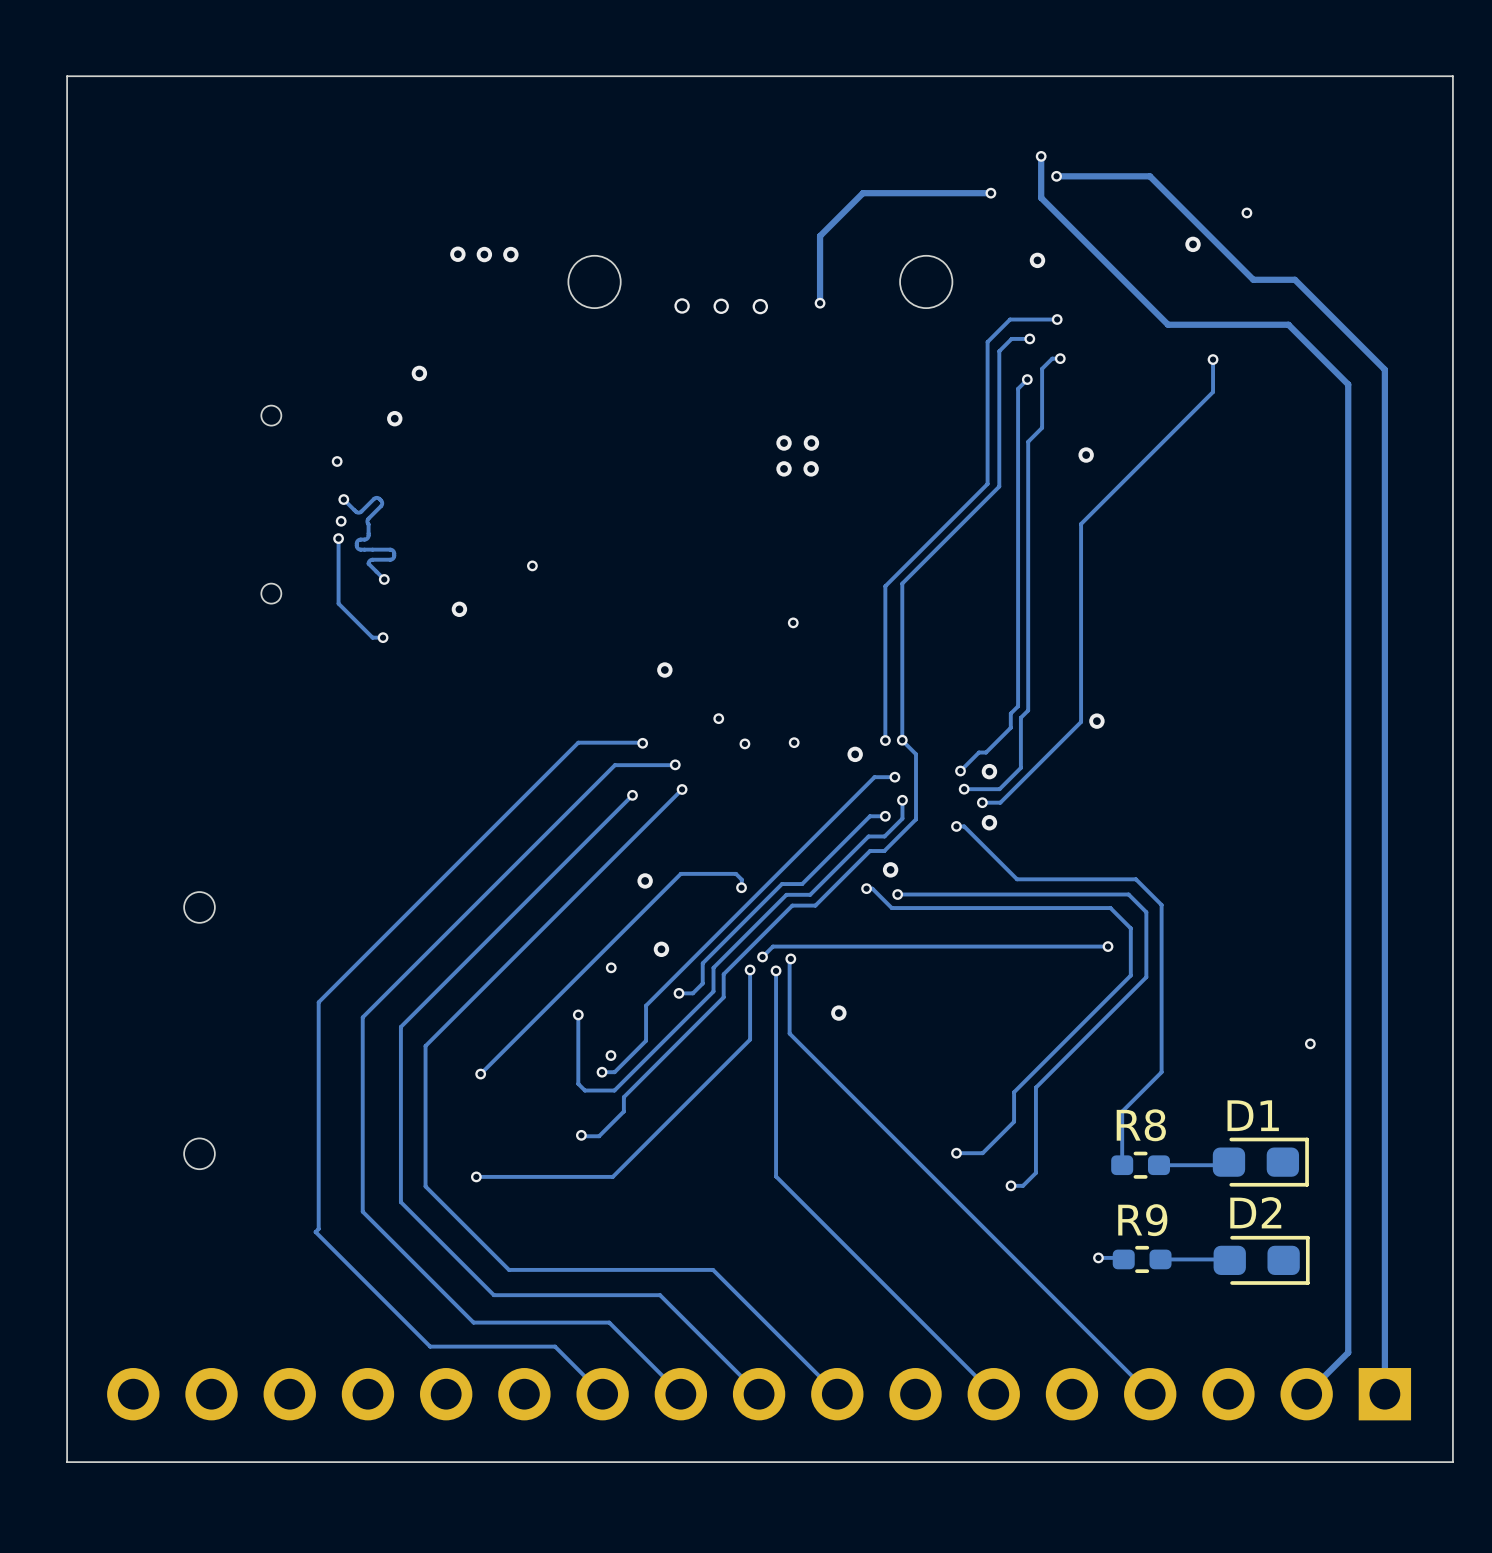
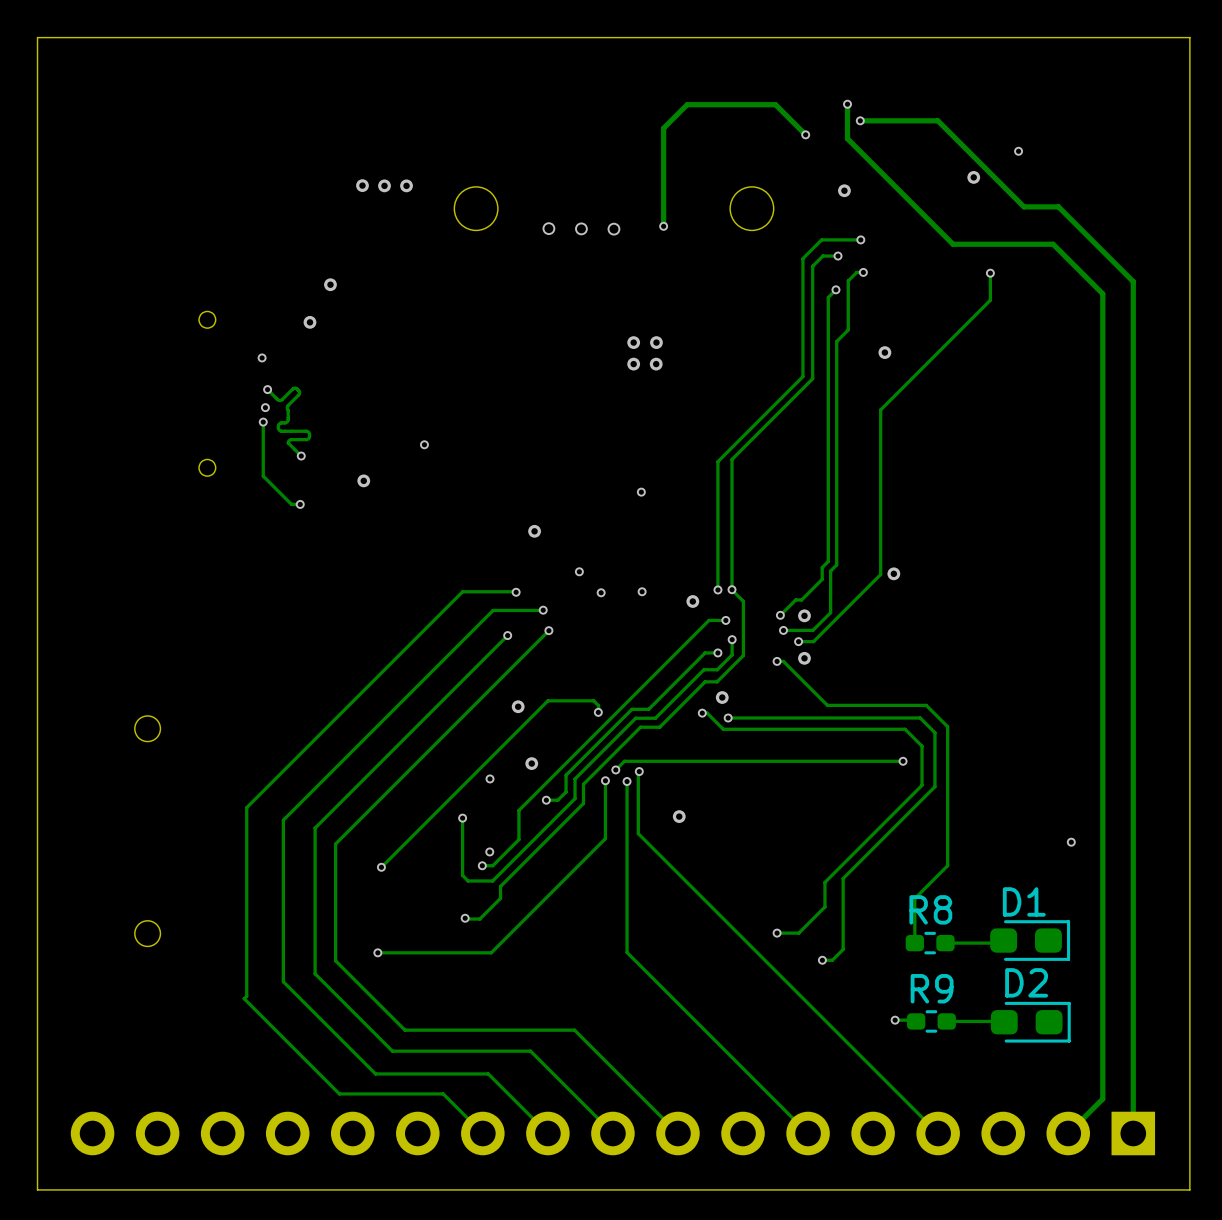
track: (990, 193) (862, 193) (820, 236) -> (802, 132) (775, 104) (687, 104) (663, 128) (663, 170)

